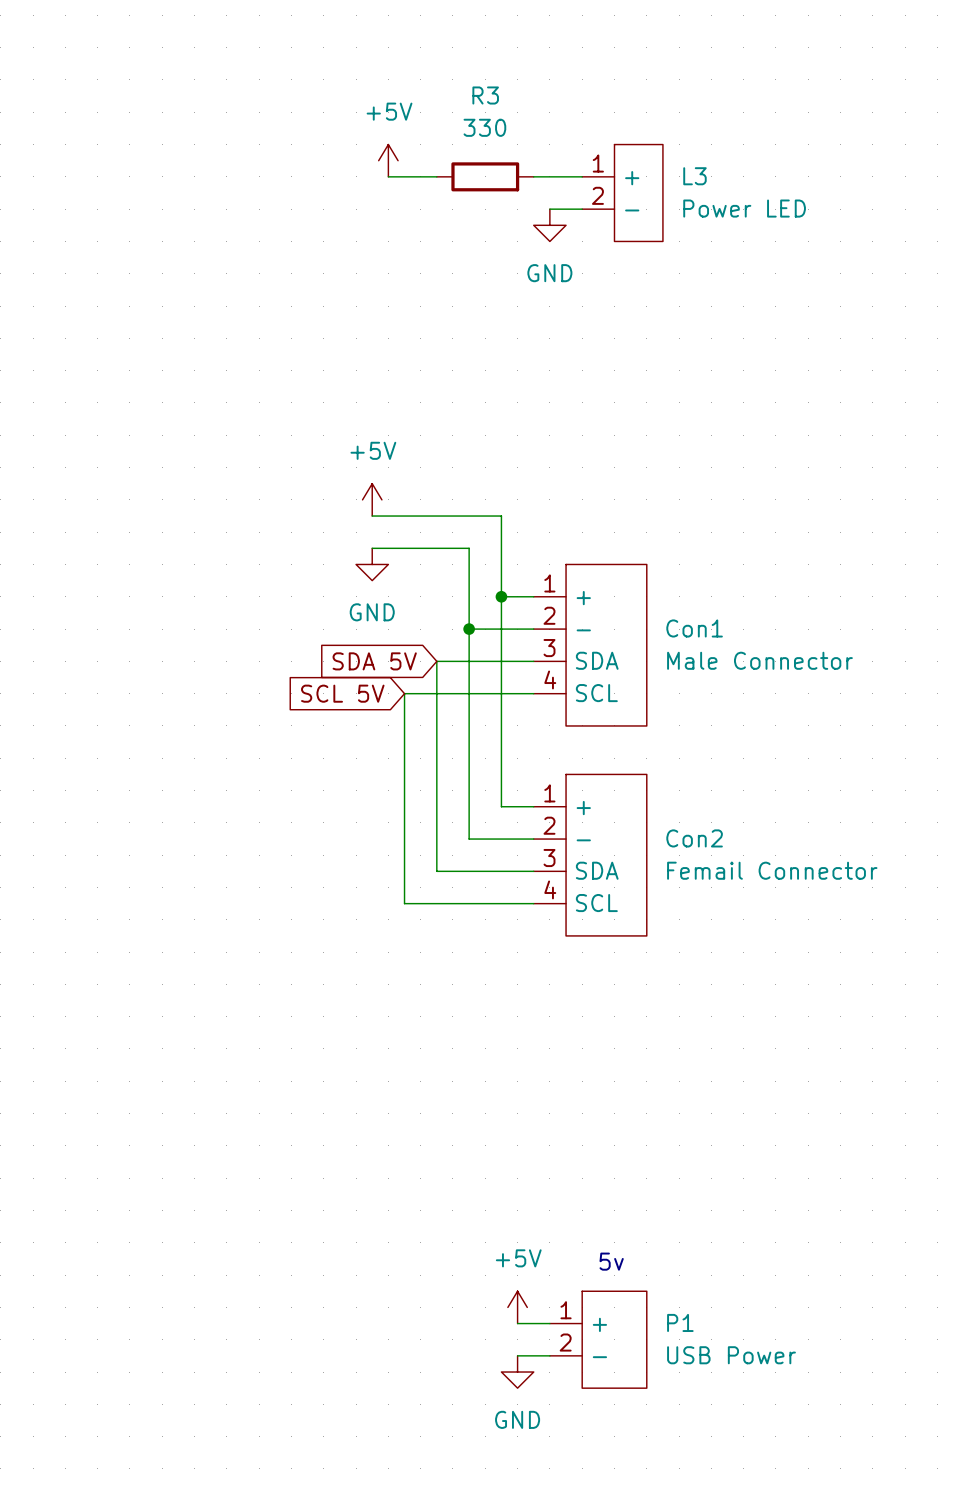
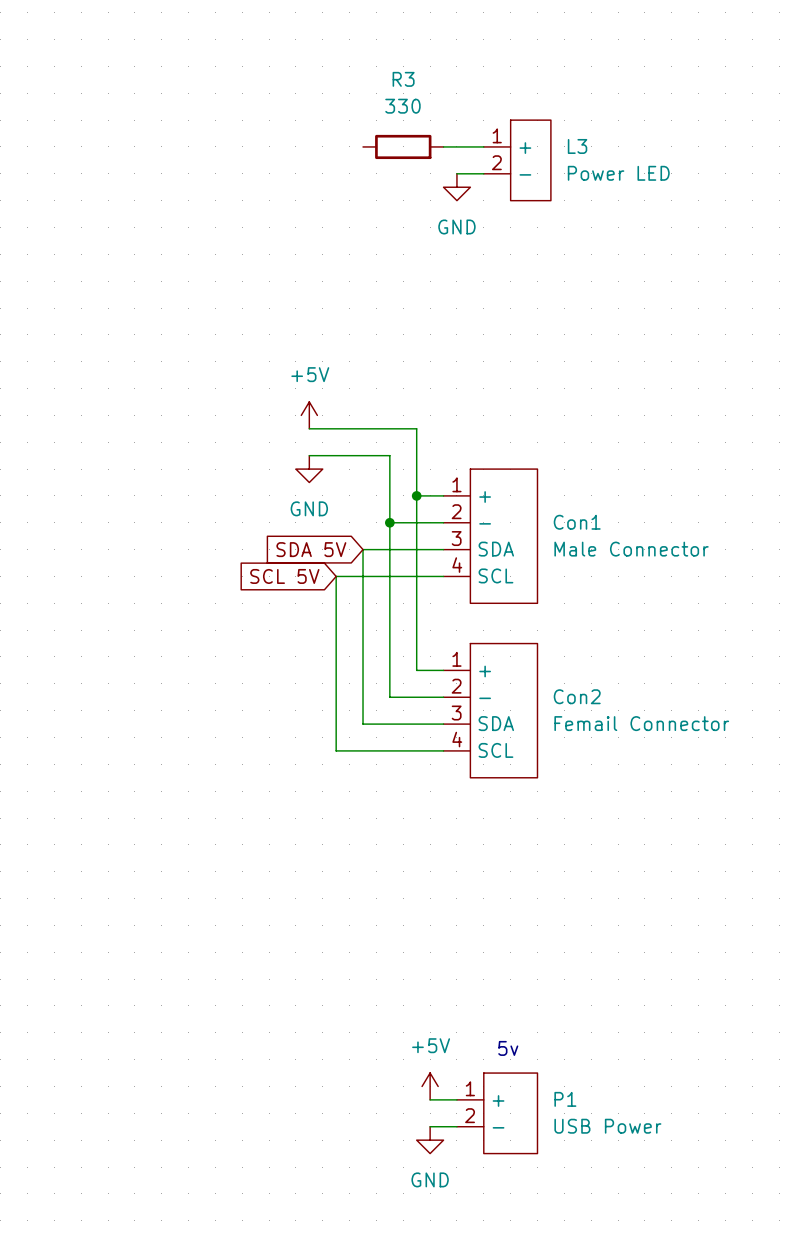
power symbol: +5V (388, 160) -> none
wire: (388, 176) (436, 176) -> none

